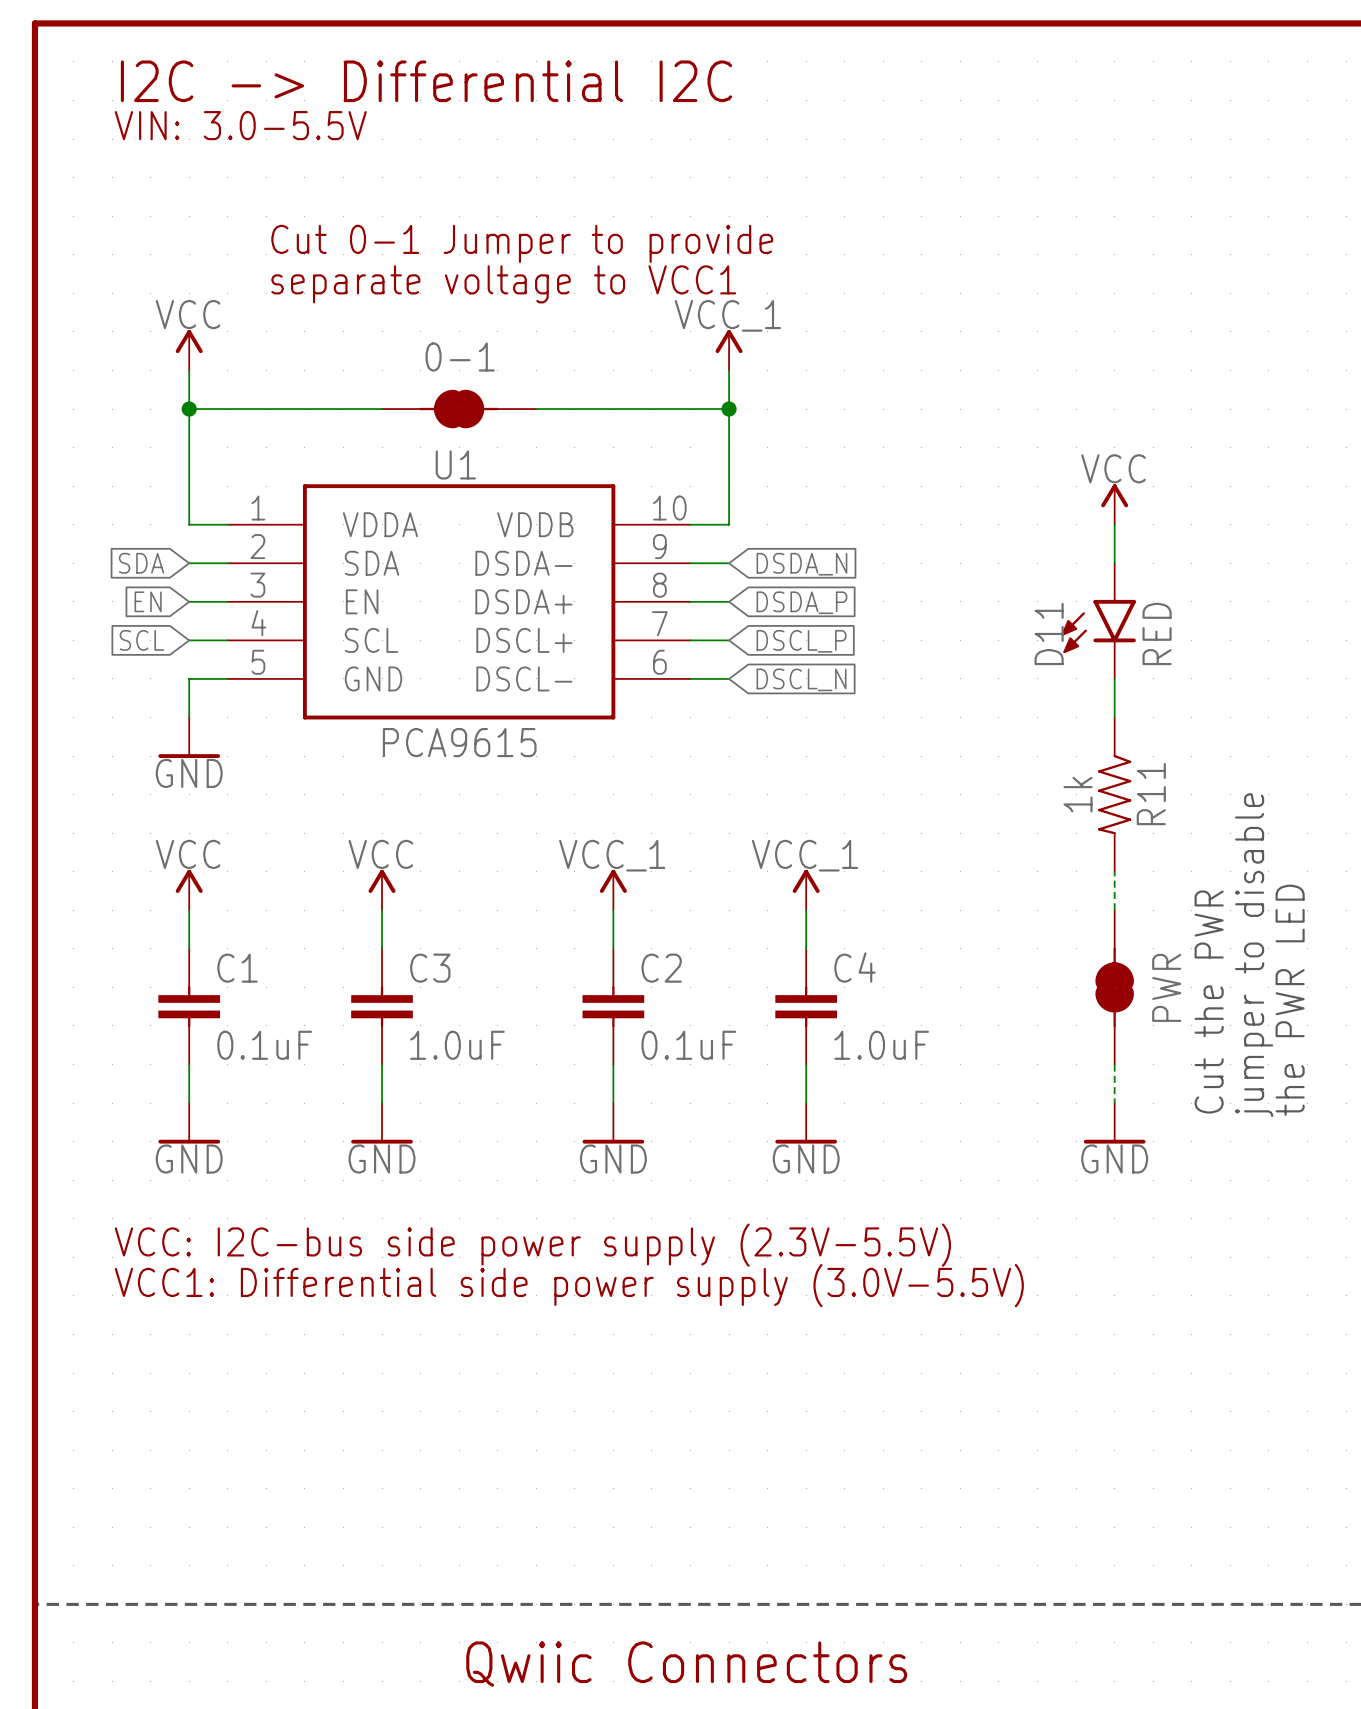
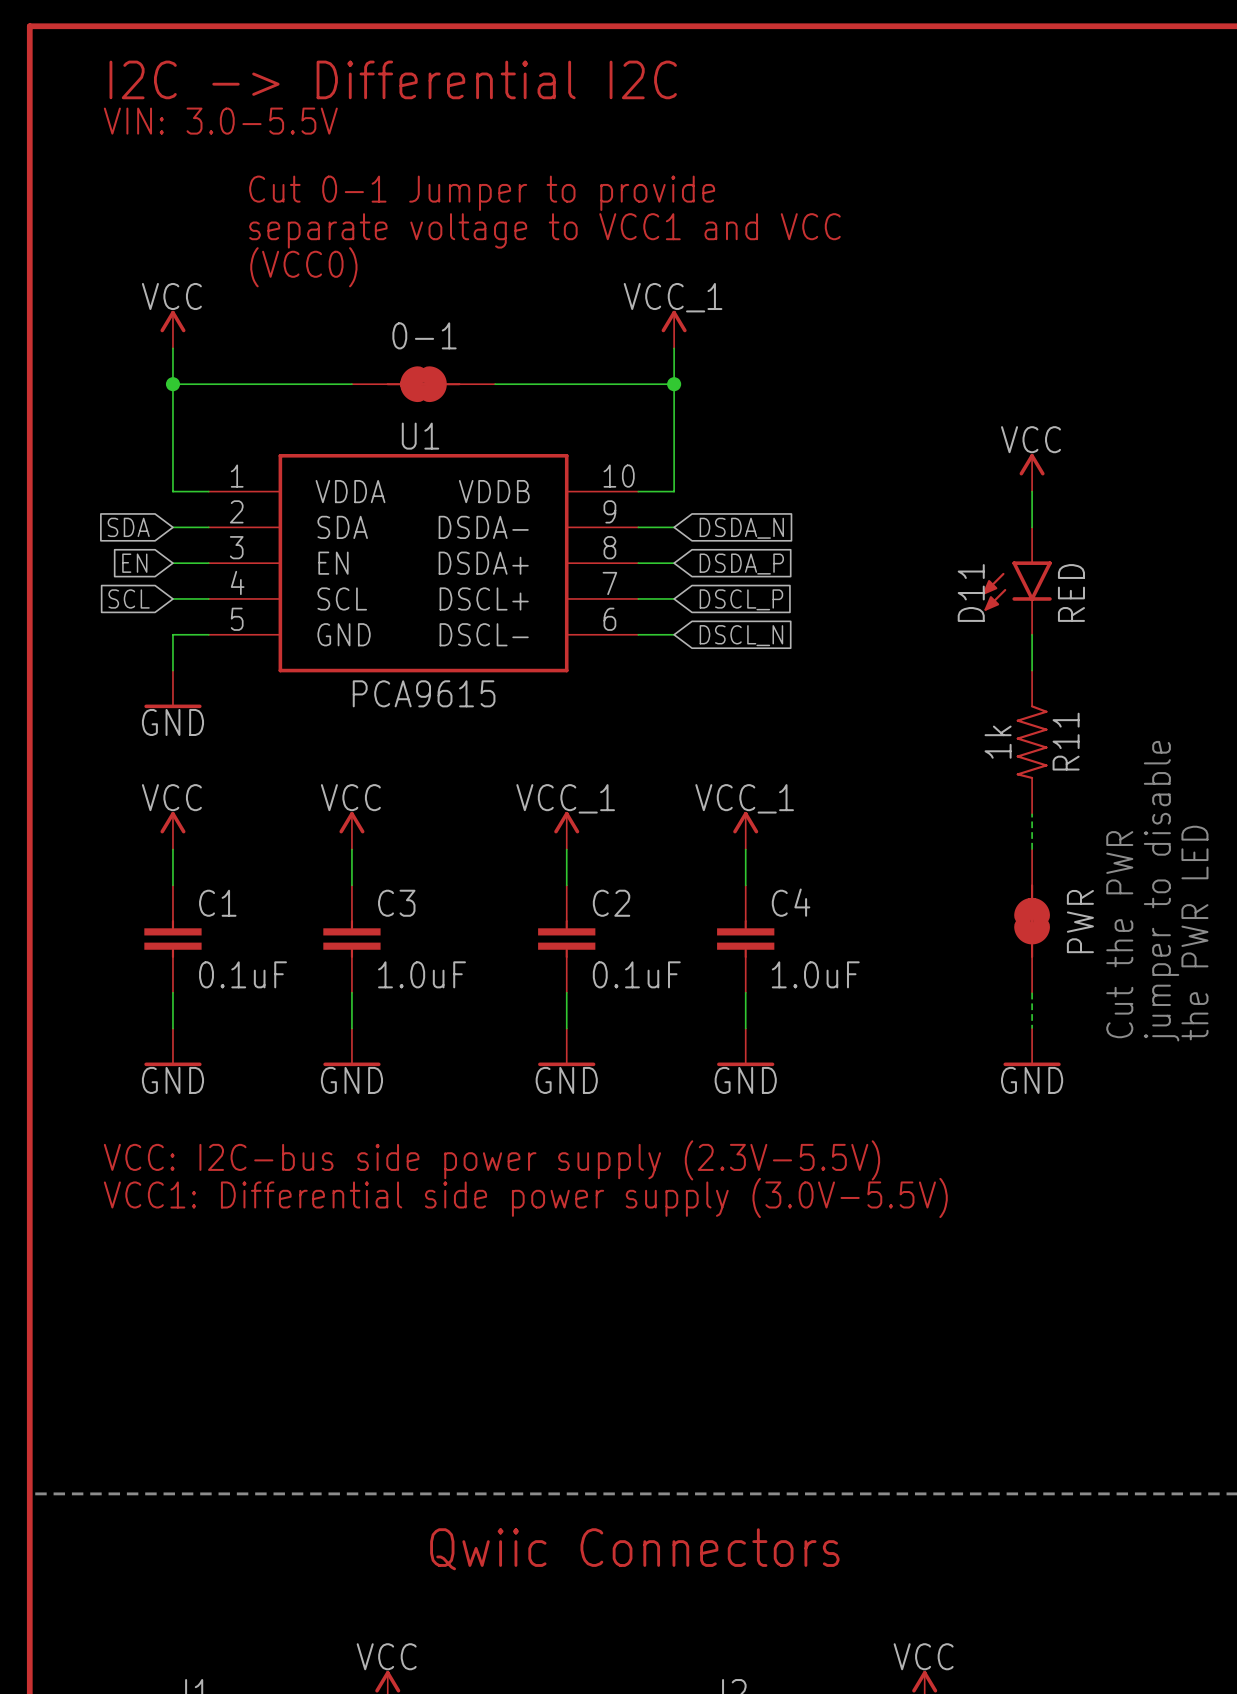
text: none -> Cut 0-1 Jumper to provide (482, 193)
text: Cut 0-1 Jumper to provide (522, 243) -> separate voltage to VCC1 and VCC (544, 230)
text: separate voltage to VCC1 (503, 284) -> (VCC0) (303, 267)

